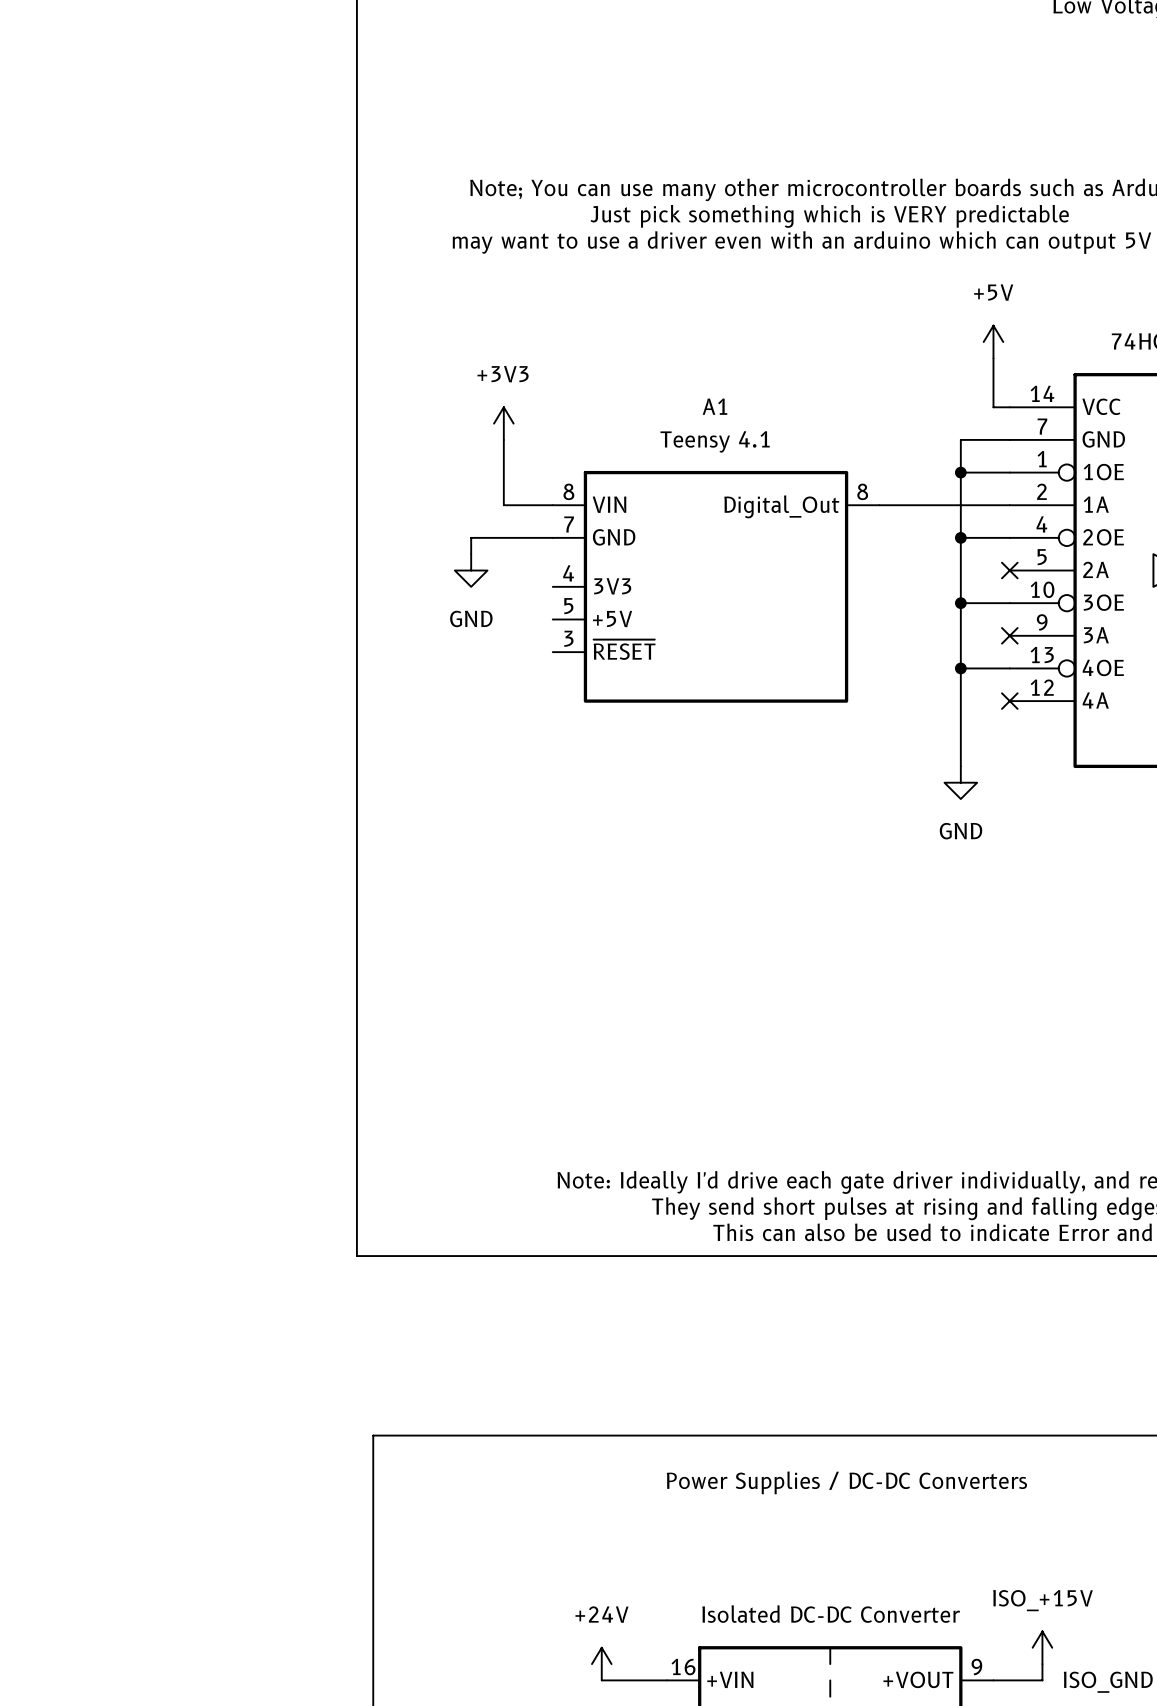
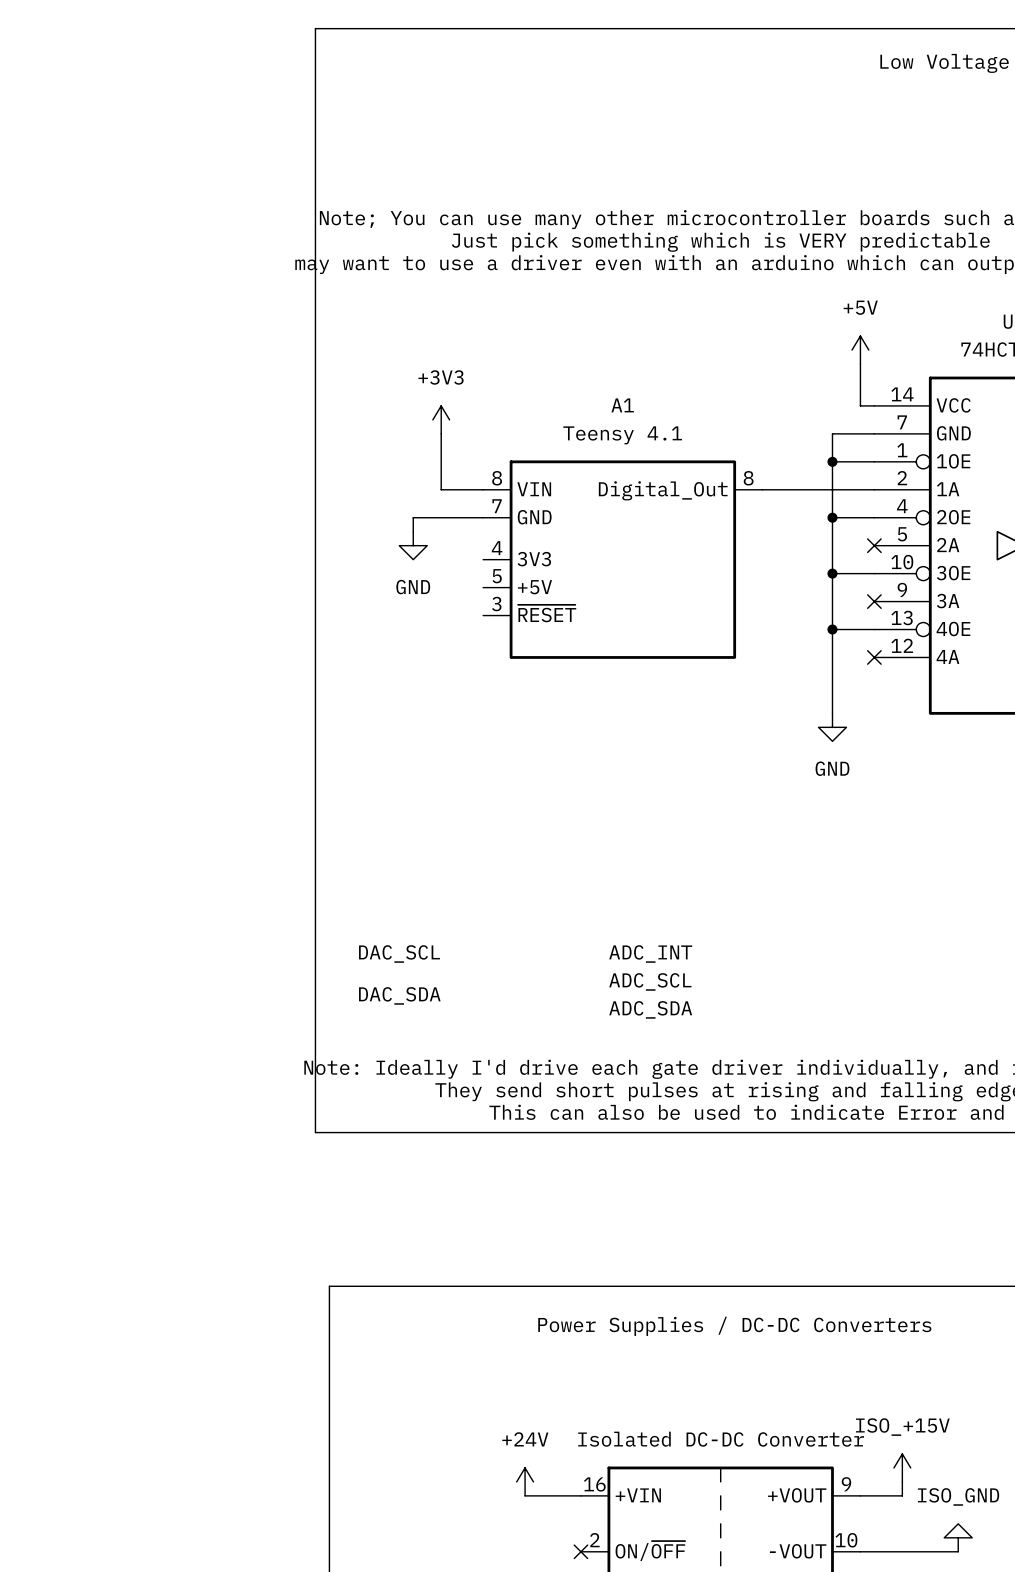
label: none -> DAC_SCL (399, 953)
label: none -> ADC_INT (650, 953)
label: none -> ADC_SCL (650, 981)
label: none -> DAC_SDA (399, 995)
label: none -> ADC_SDA (650, 1009)

